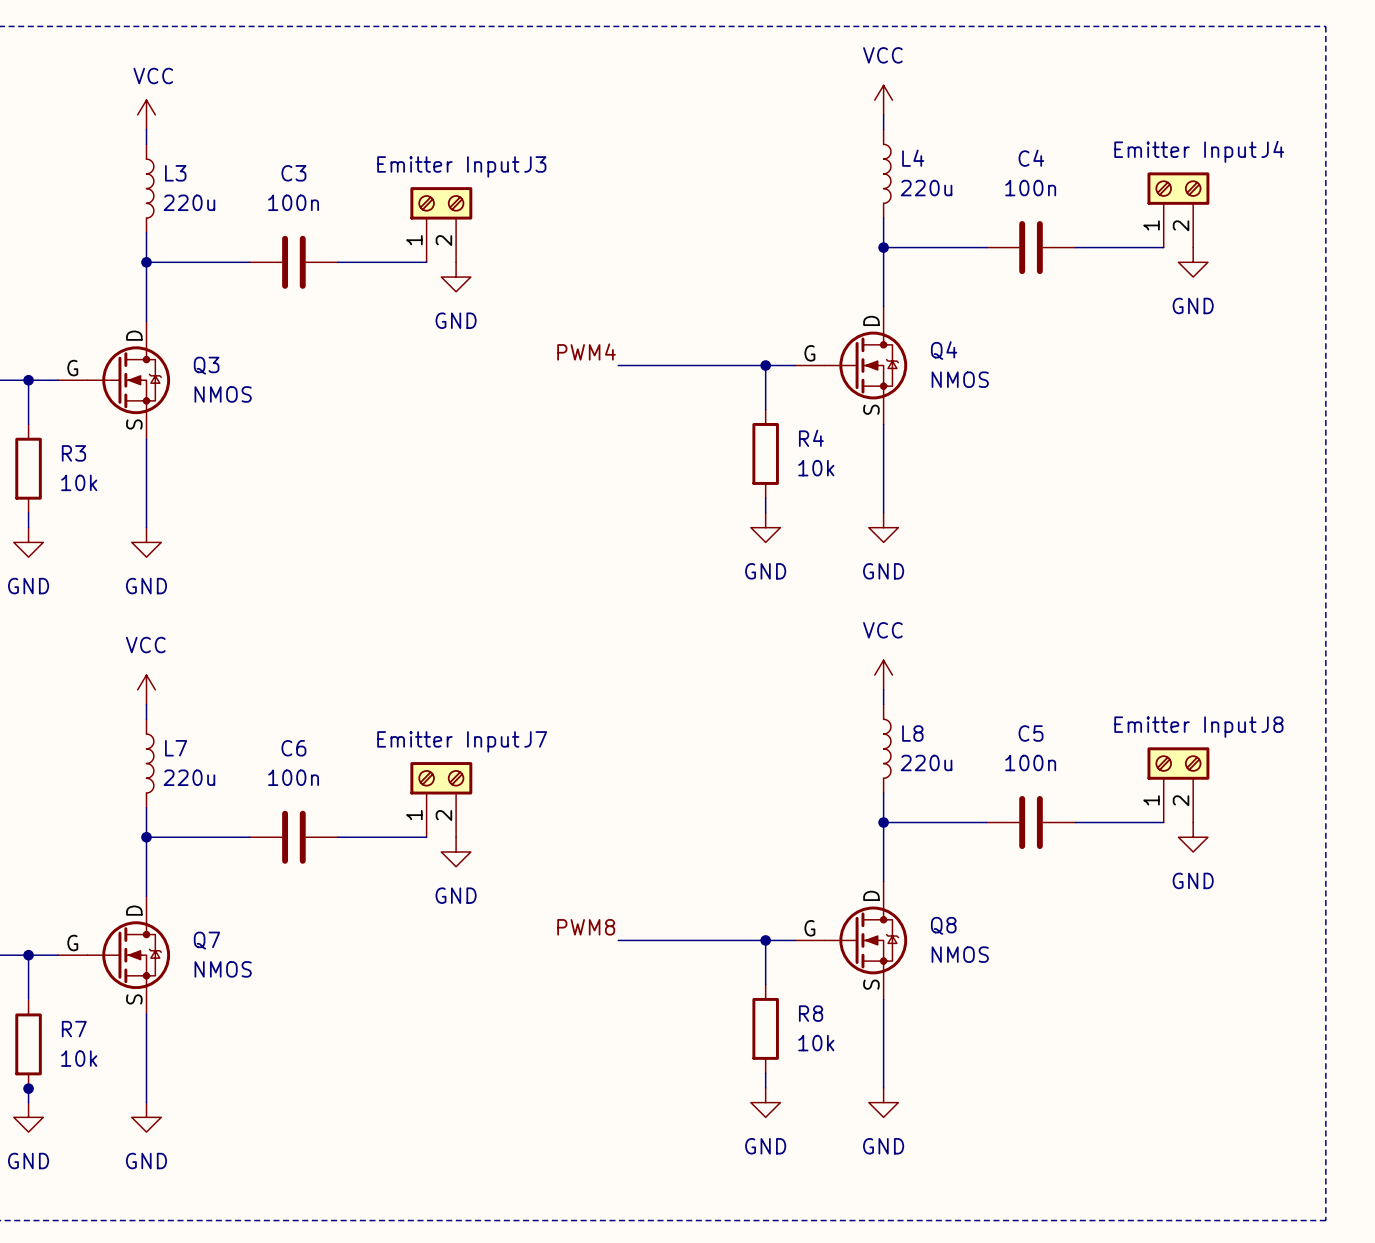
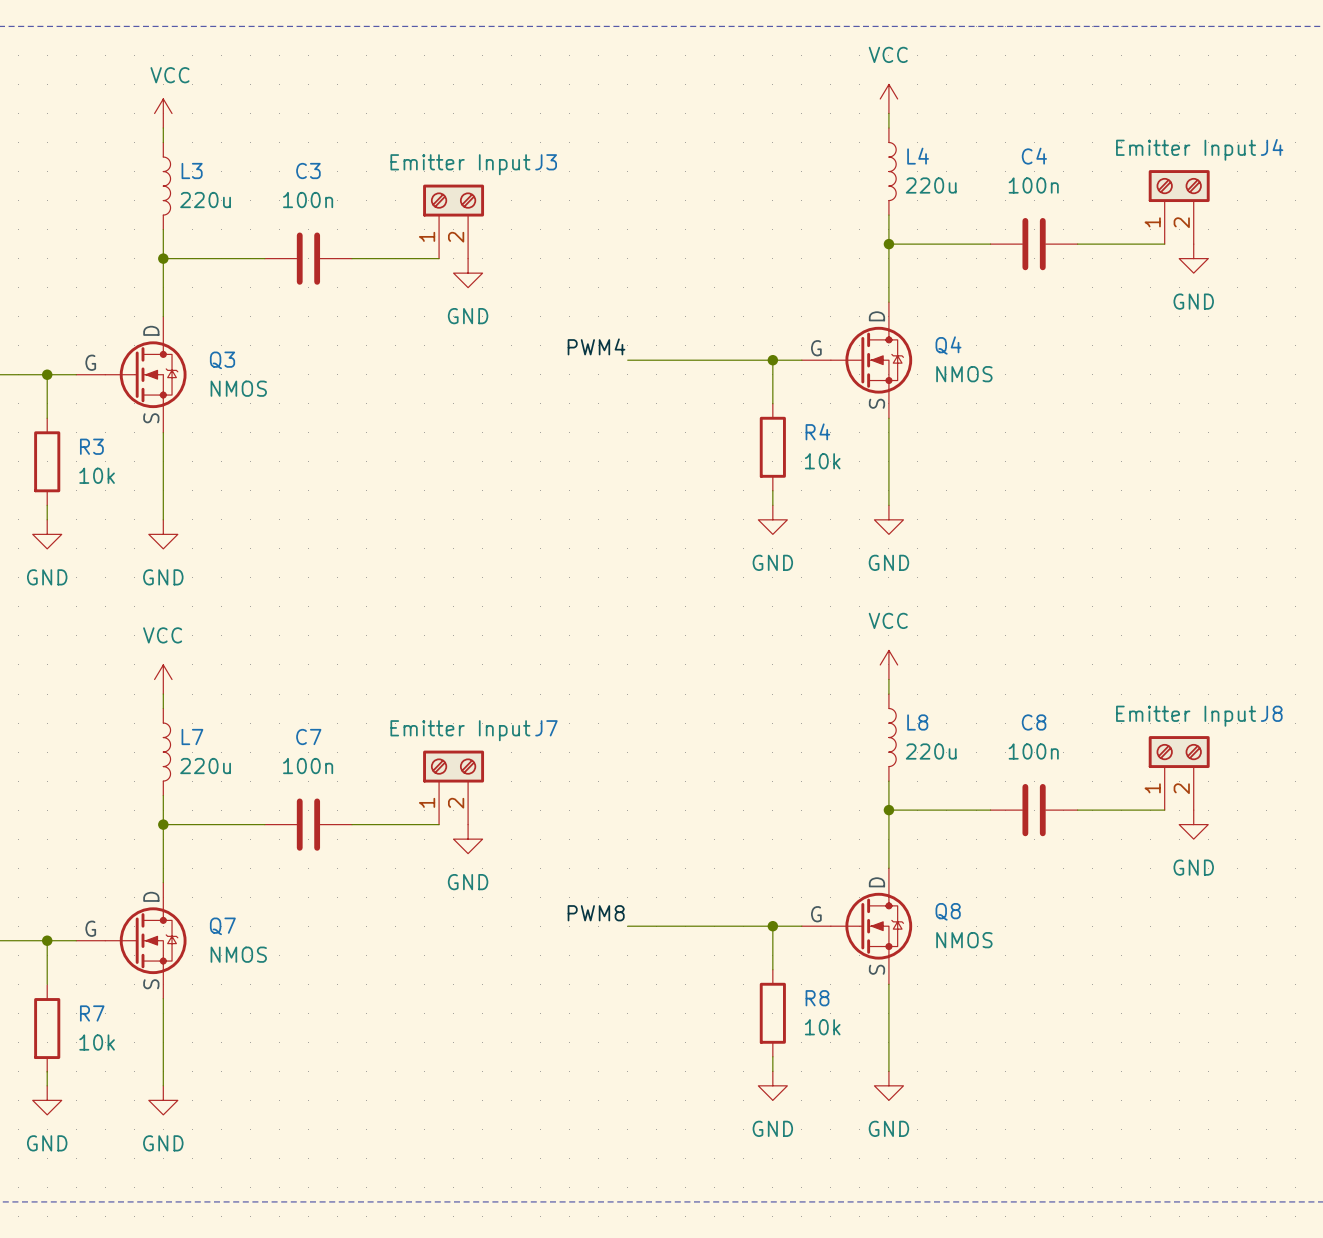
C5 name: C5 (1031, 733) -> C8 (1034, 722)
C6 name: C6 (293, 748) -> C7 (308, 737)
junction: (28, 1088) -> none

